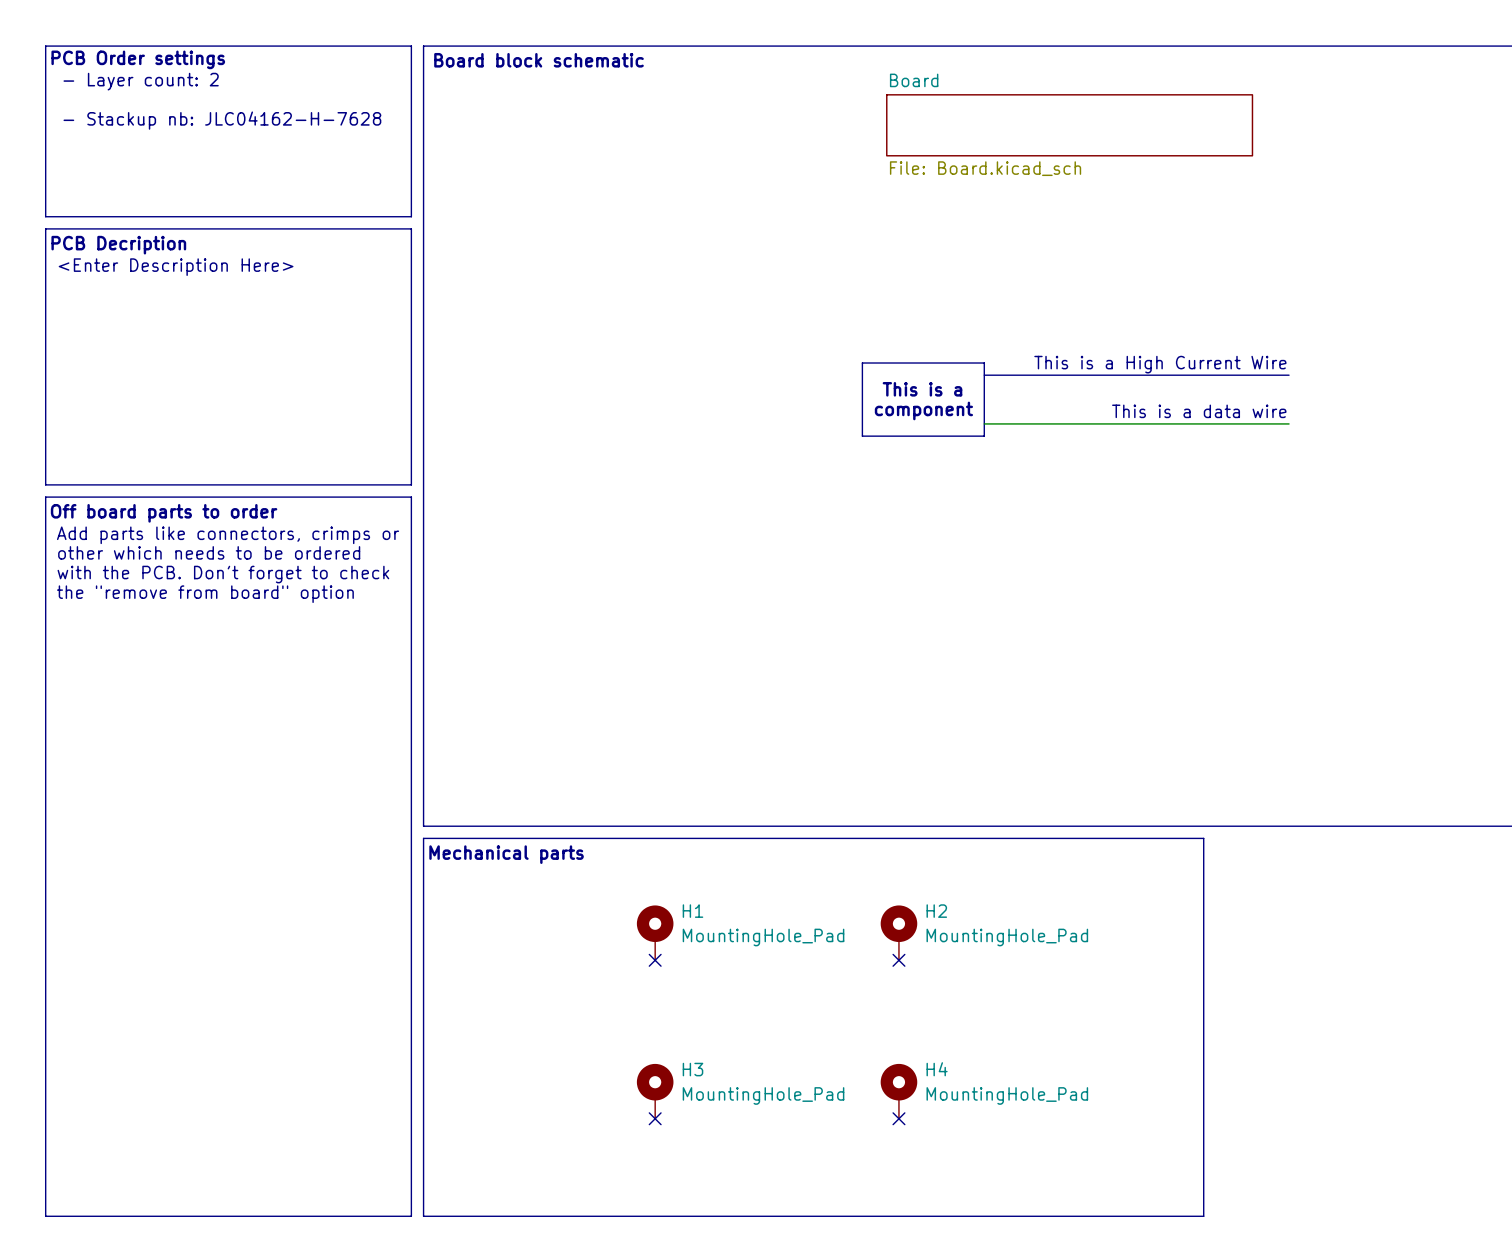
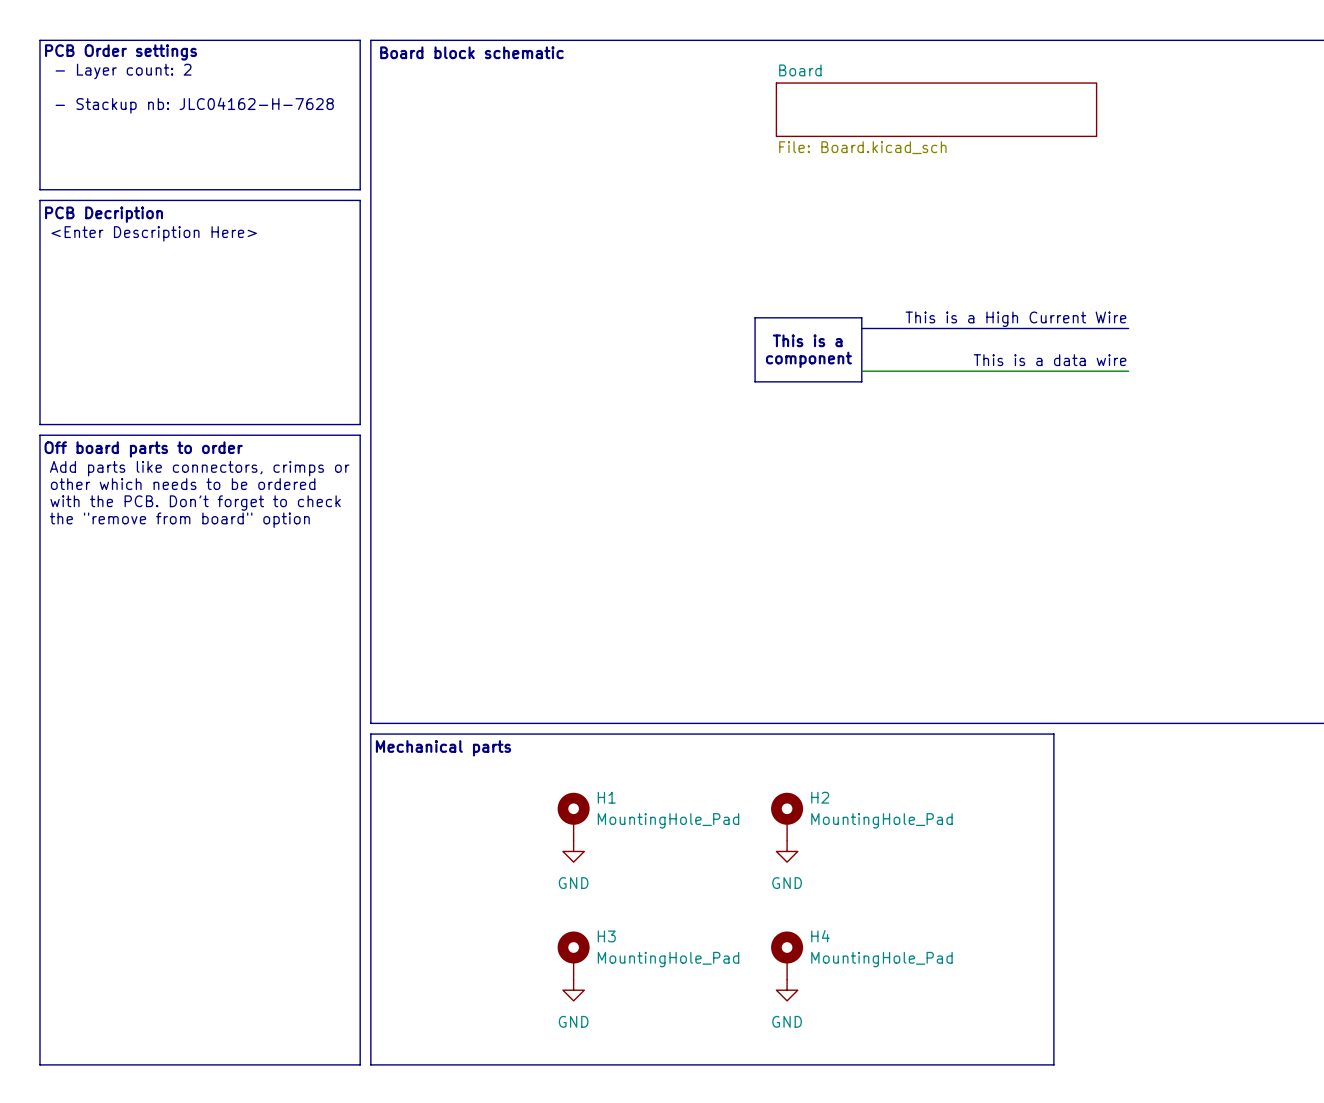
no-connect mark: (655, 960) -> none
no-connect mark: (898, 960) -> none
power symbol: none -> GND (573, 851)
power symbol: none -> GND (787, 851)
no-connect mark: (655, 1118) -> none
no-connect mark: (898, 1118) -> none
power symbol: none -> GND (573, 990)
power symbol: none -> GND (787, 990)

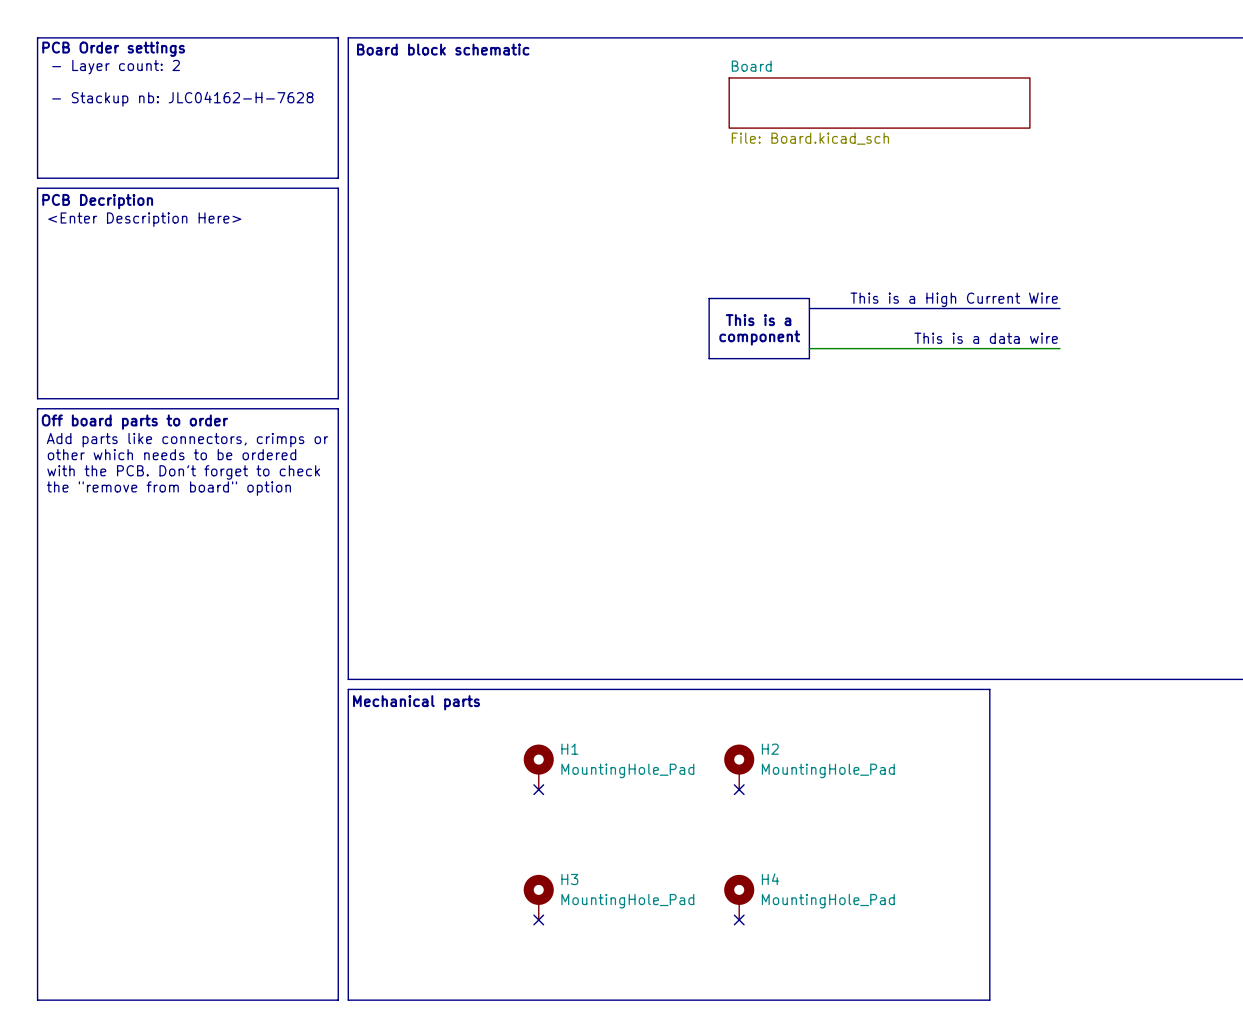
no-connect mark: none -> (538, 789)
no-connect mark: none -> (739, 789)
power symbol: GND (573, 851) -> none
power symbol: GND (787, 851) -> none
no-connect mark: none -> (538, 919)
no-connect mark: none -> (739, 919)
power symbol: GND (573, 990) -> none
power symbol: GND (787, 990) -> none

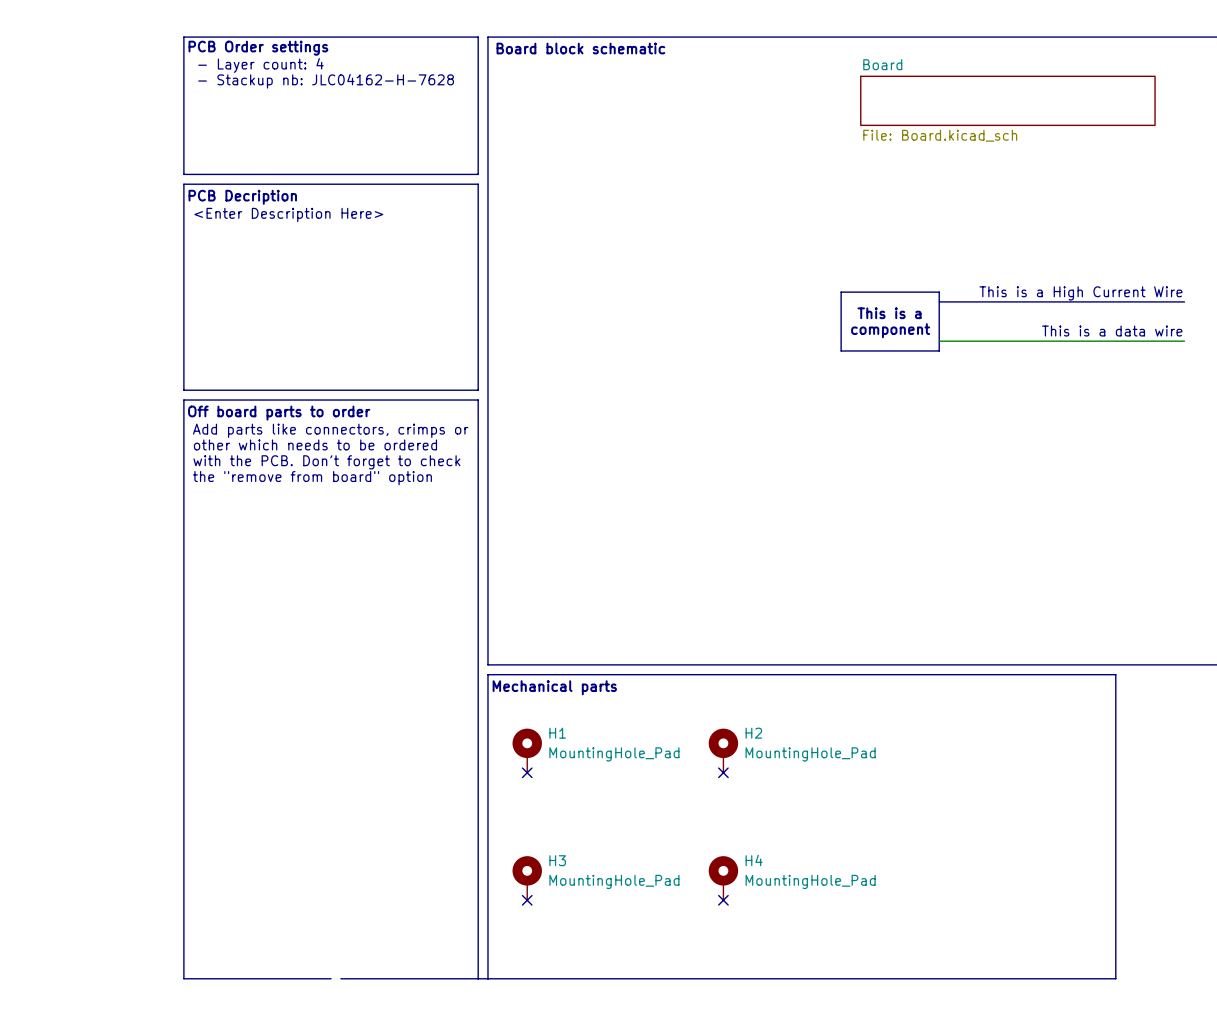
line: (187, 37) (37, 37) (37, 178) (187, 178) -> (183, 37) (183, 174)
line: (338, 37) (338, 178) -> (331, 37) (340, 37)
line: (348, 37) (348, 679) (498, 679) -> (487, 37) (487, 664)
line: (488, 37) (498, 37) -> (478, 37) (478, 174) (331, 174)
text position: PCB Order settings (113, 49) -> PCB Order settings (258, 48)
text position: Board block schematic (443, 49) -> Board block schematic (580, 48)
text: - Layer count: 2 (116, 67) -> - Layer count: 4 (260, 65)
text position: - Stackup nb: JLC04162-H-7628 (182, 99) -> - Stackup nb: JLC04162-H-7628 (326, 81)
sheet Board position: (879, 103) -> (1007, 100)
line: (187, 188) (37, 188) (37, 398) (187, 398) -> (183, 184) (183, 390)
line: (338, 188) (338, 398) -> (331, 184) (478, 184) (478, 390) (331, 390)
text position: PCB Decription (97, 201) -> PCB Decription (242, 197)
text position: <Enter Description Here> (144, 219) -> <Enter Description Here> (288, 214)
line: (709, 298) (809, 298) (809, 358) (709, 358) (709, 298) -> (841, 292) (939, 292) (939, 350) (841, 350) (841, 292)
text position: This is a High Current Wire (954, 299) -> This is a High Current Wire (1080, 293)
bus: (809, 308) (959, 308) -> none
bus: none -> (1037, 301) (1184, 301)
text position: This is a (758, 320) -> This is a (889, 313)
text position: component (759, 337) -> component (890, 330)
text position: This is a data wire (986, 338) -> This is a data wire (1112, 331)
wire: (809, 348) (959, 348) -> none
wire: none -> (1037, 341) (1184, 341)
line: (187, 408) (37, 408) (37, 1000) (187, 1000) -> (183, 400) (183, 978)
line: (338, 408) (338, 1000) -> (331, 400) (478, 400) (478, 978)
text position: Off board parts to order (134, 422) -> Off board parts to order (279, 413)
text position: Add parts like connectors, crimps or (187, 440) -> Add parts like connectors, crimps or (330, 430)
text position: other which needs to be ordered (172, 454) -> other which needs to be ordered (315, 444)
text position: with the PCB. Don't forget to check (183, 472) -> with the PCB. Don't forget to check (326, 462)
text position: the "remove from board" option (168, 488) -> the "remove from board" option (312, 478)
line: (498, 689) (348, 689) (348, 1000) -> (487, 674) (487, 978)
line: (989, 689) (989, 1000) -> (968, 674) (1115, 674) (1115, 978) (968, 978)
text position: Mechanical parts (416, 702) -> Mechanical parts (554, 687)

